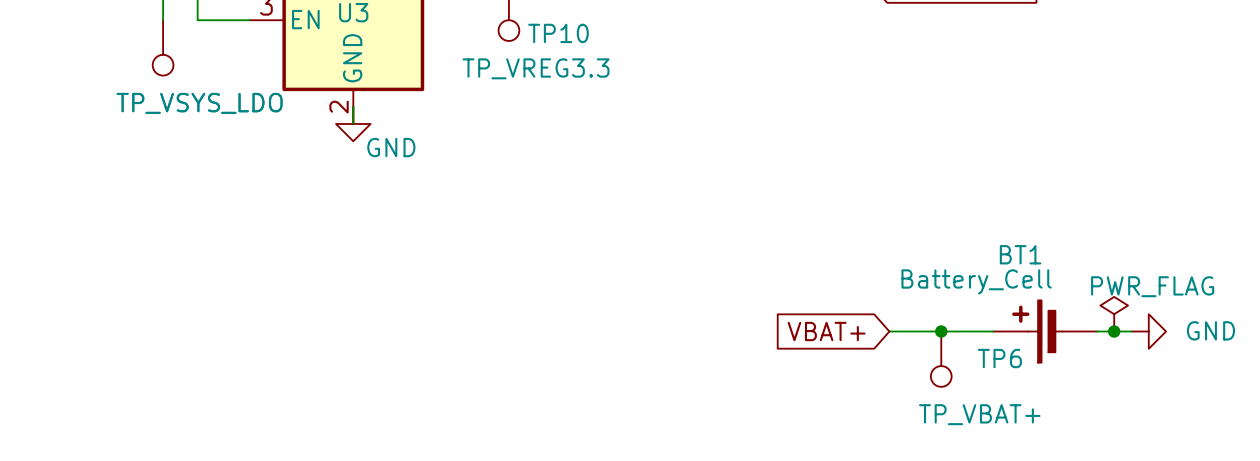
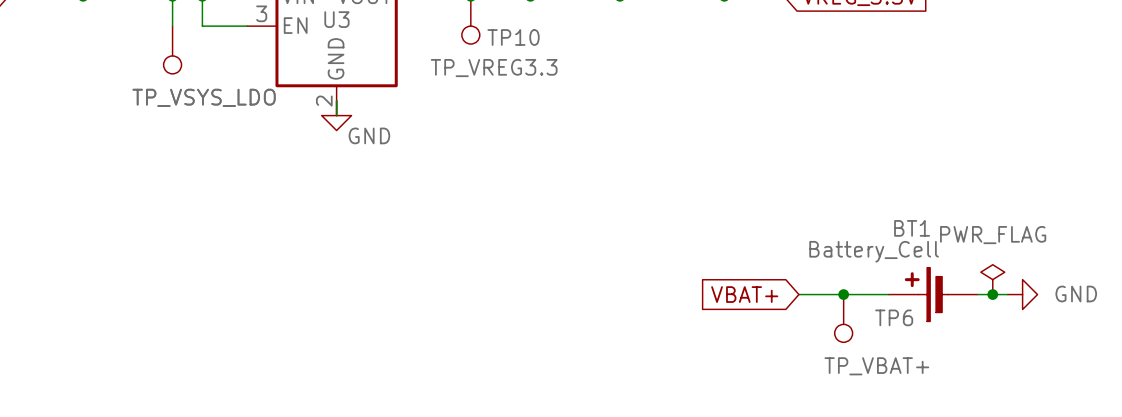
power symbol text position: PWR_FLAG (1152, 286) -> PWR_FLAG (993, 235)

